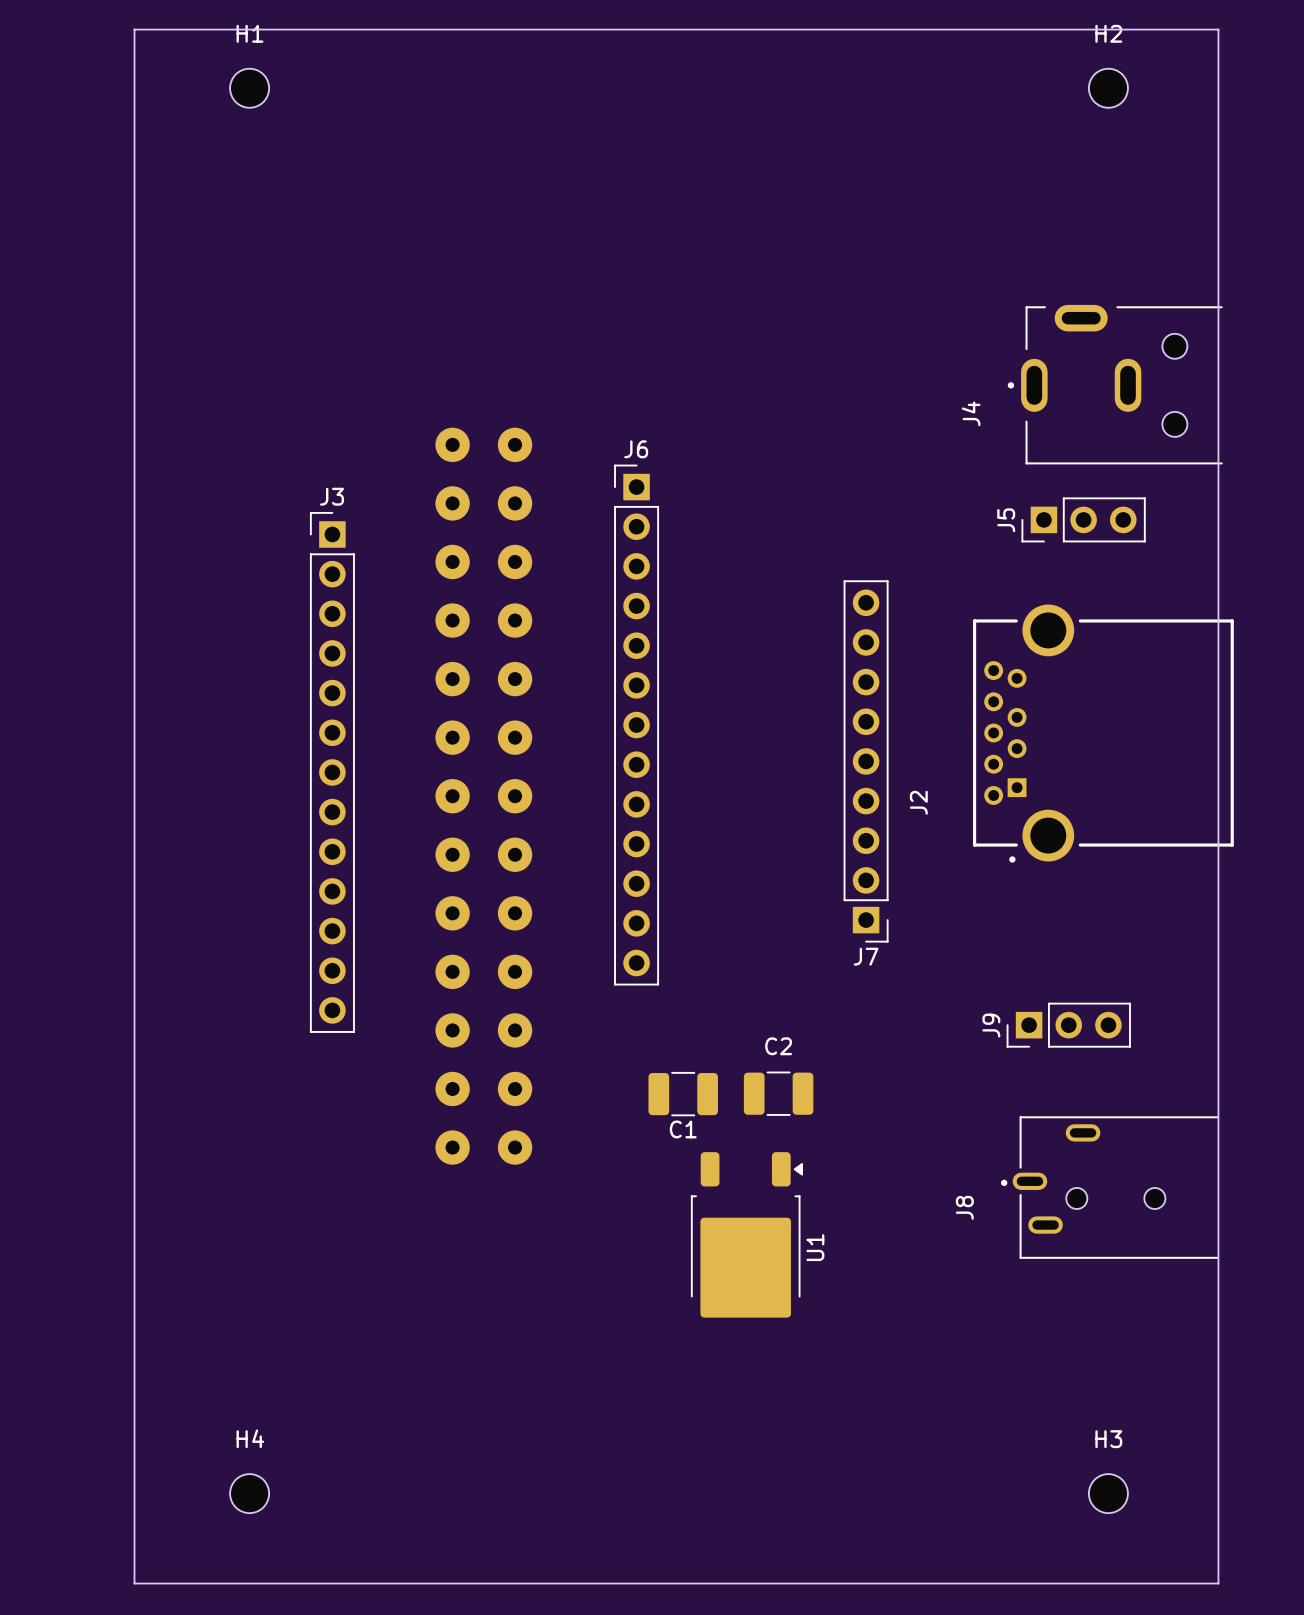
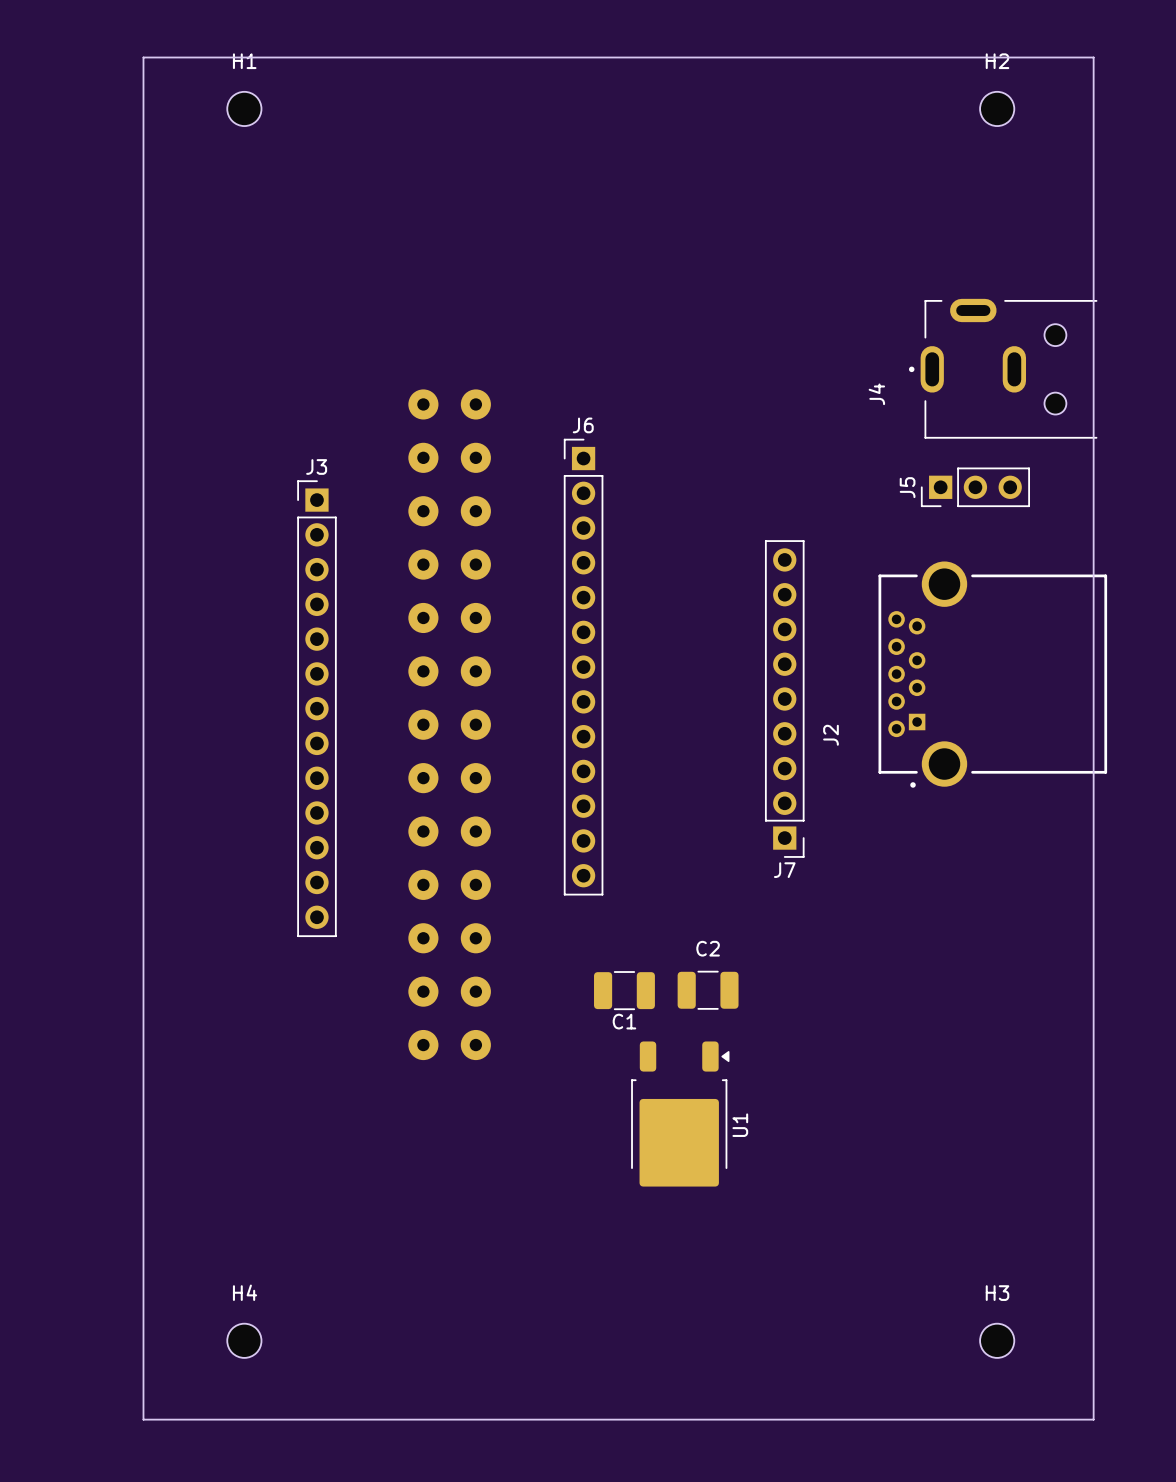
part footprint: [435, 427, 533, 1165] -> [408, 389, 491, 1061]
J9: (1068, 1025) -> none
J8: (1109, 1187) -> none

